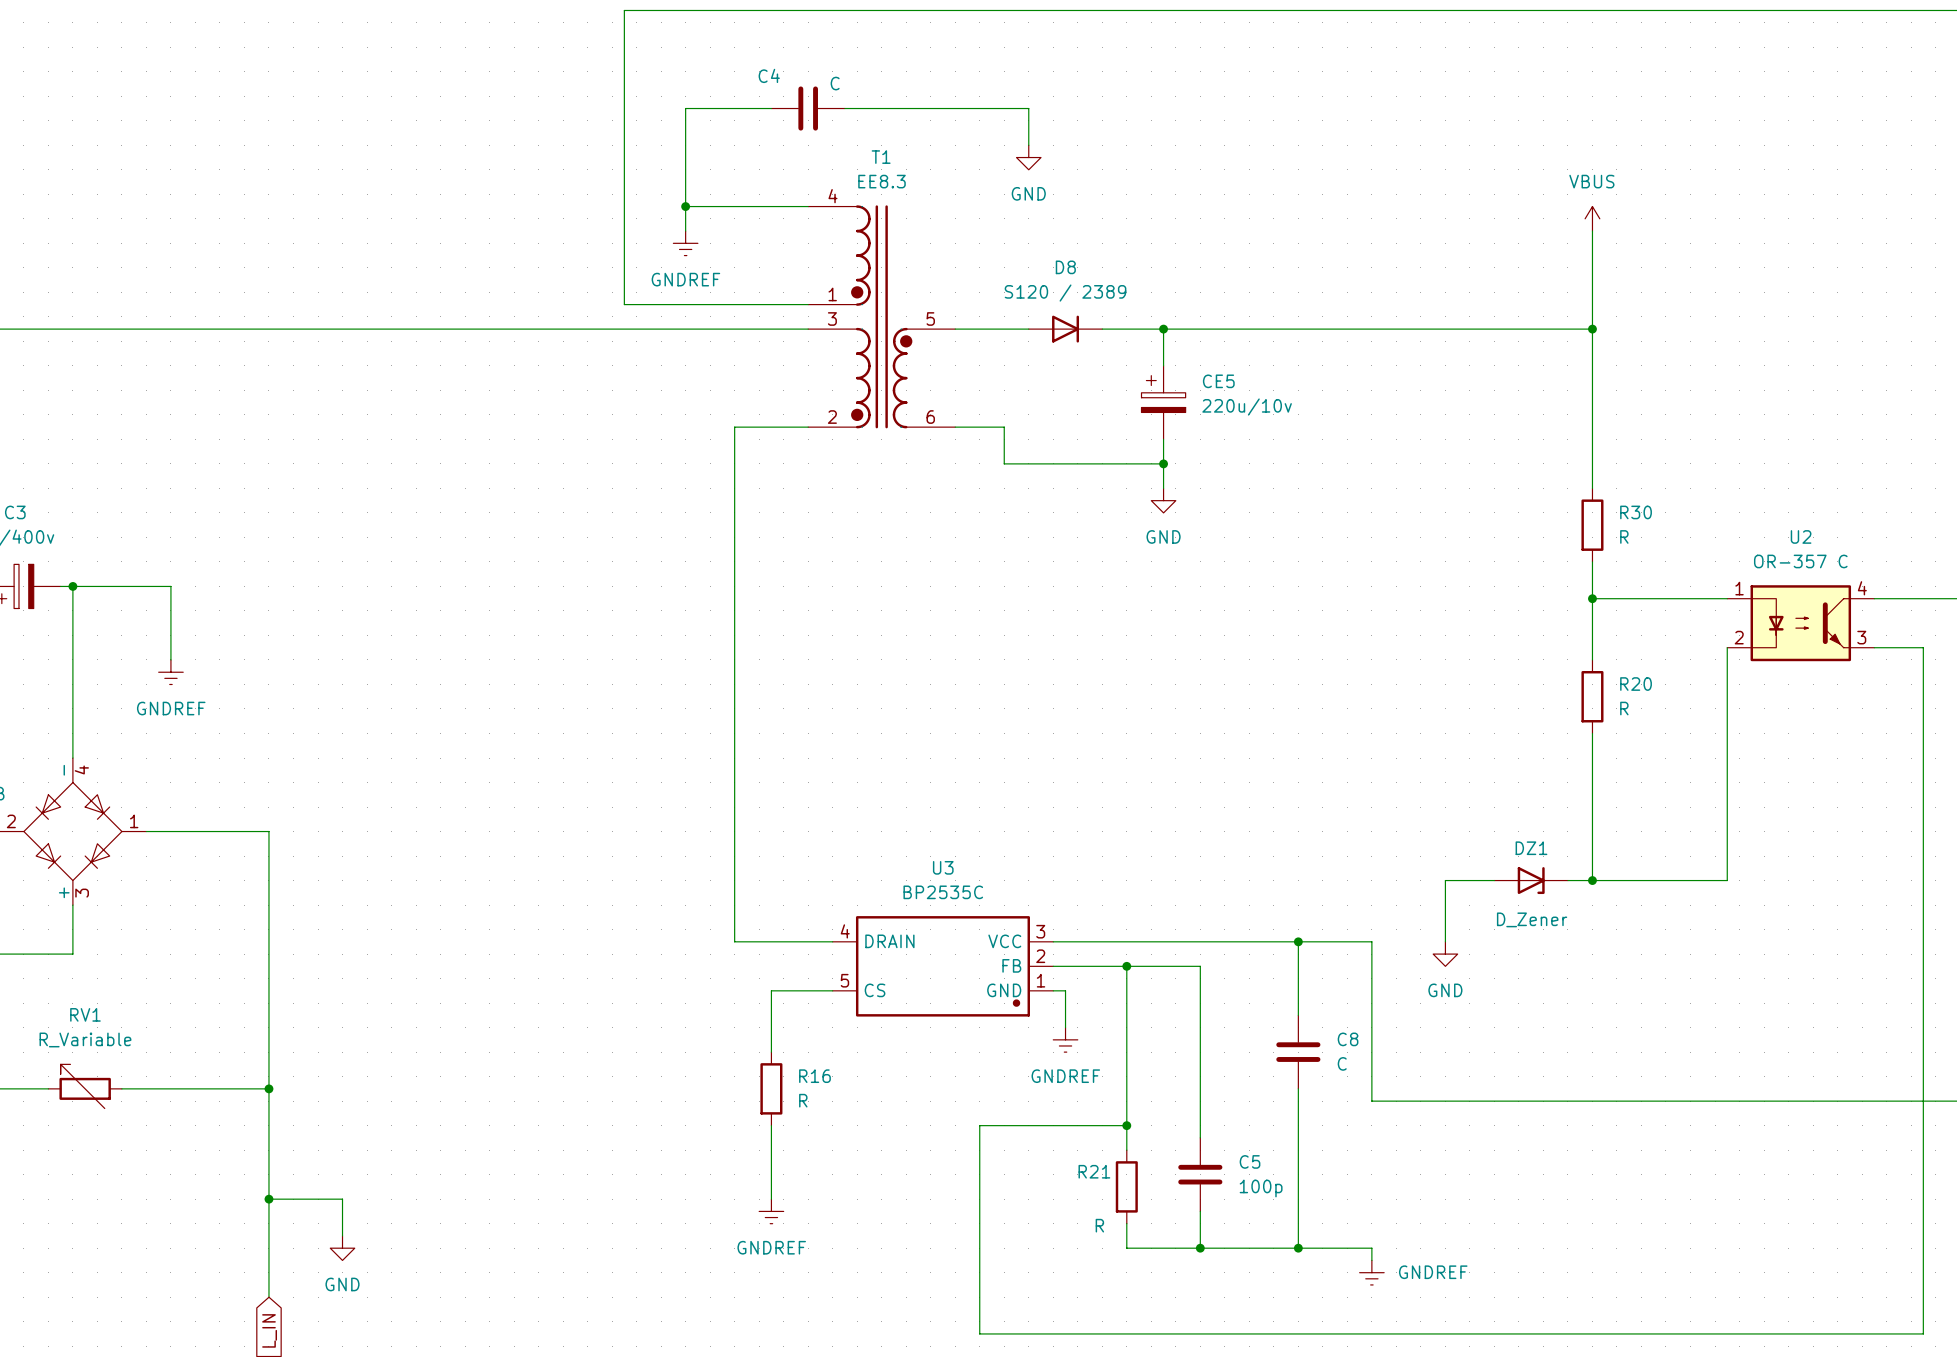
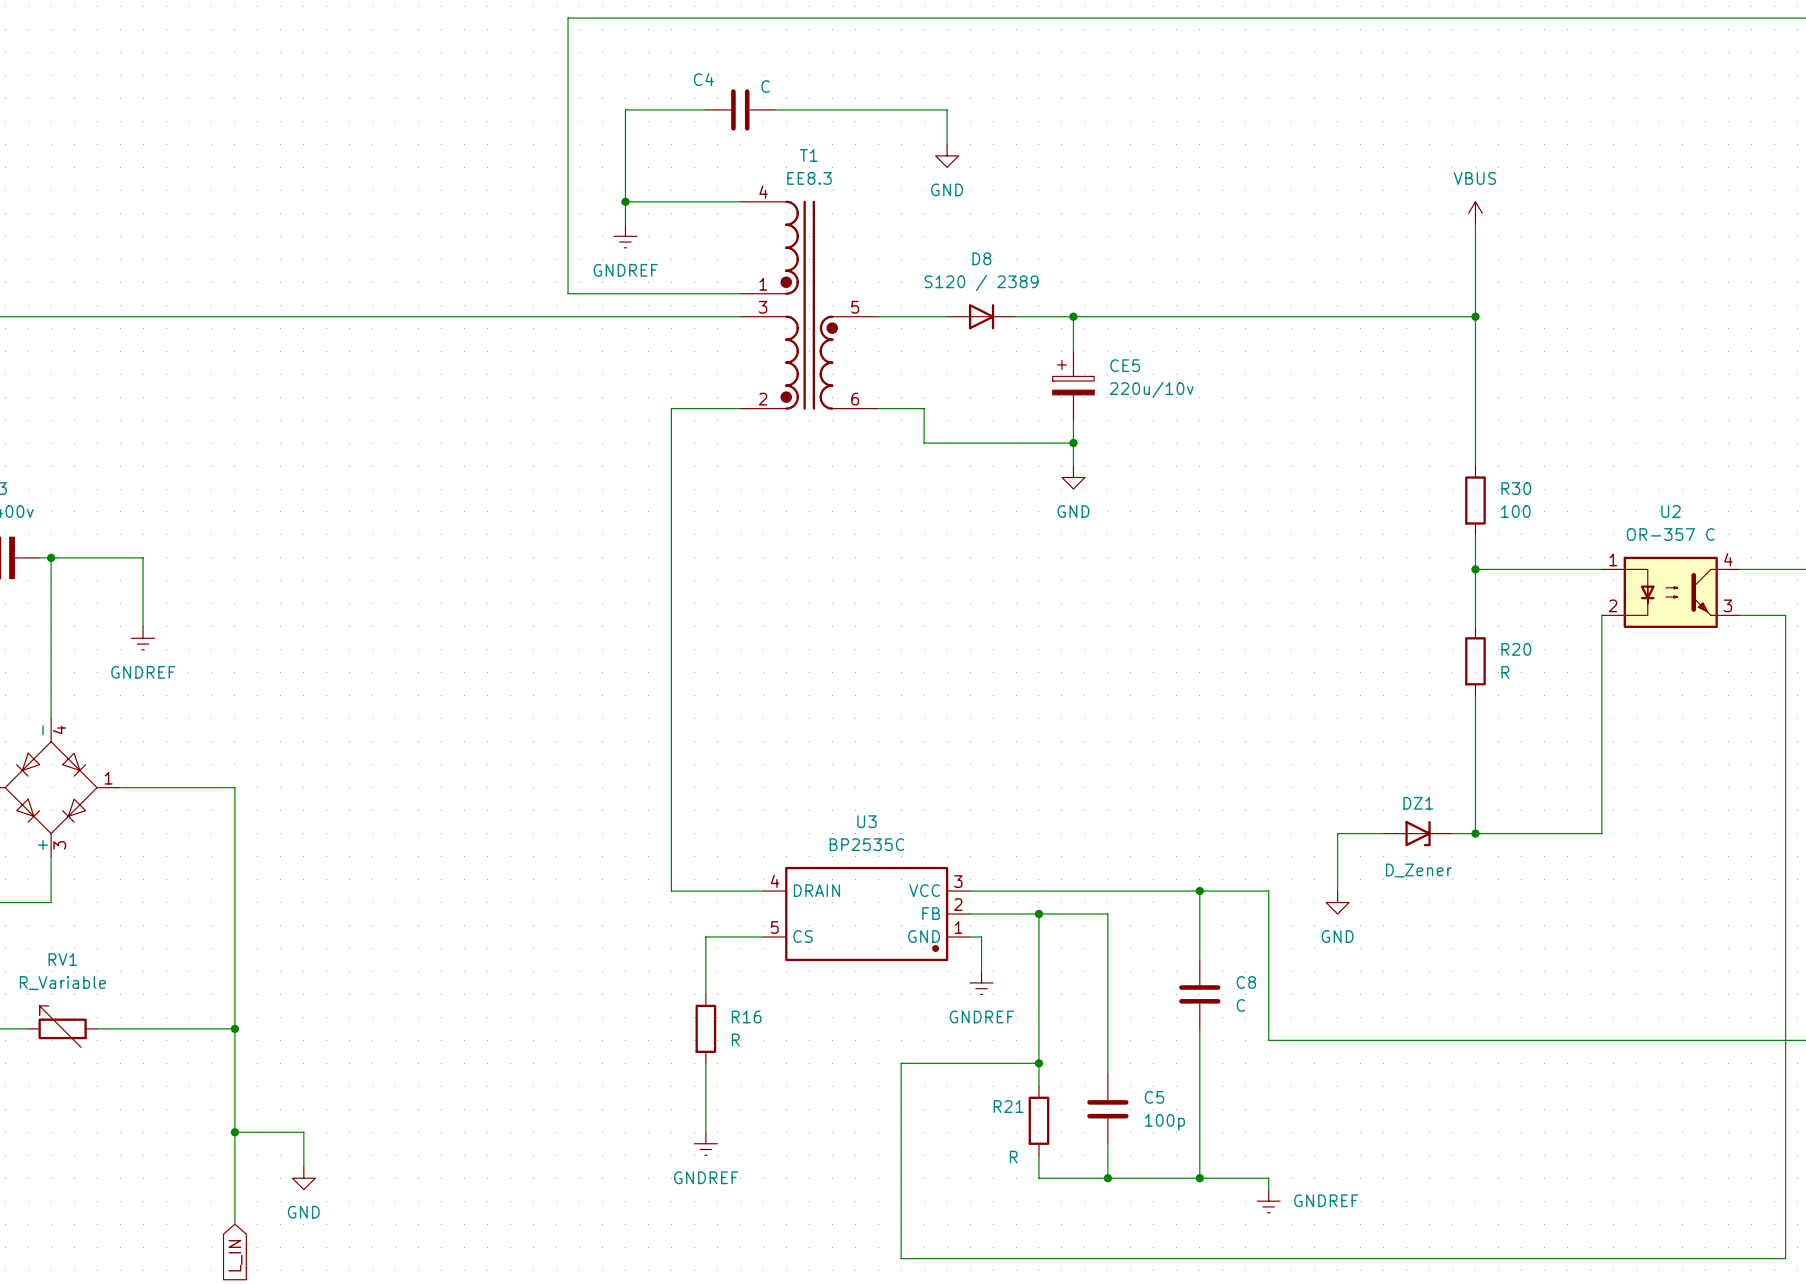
R30 value: R (1624, 536) -> 100 (1515, 511)

